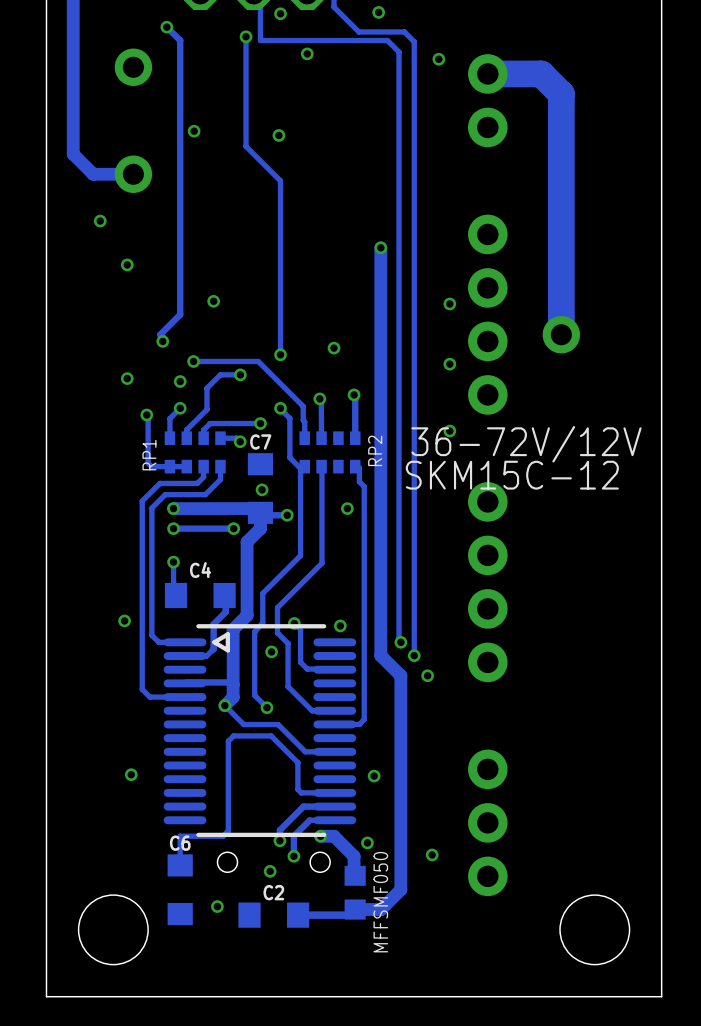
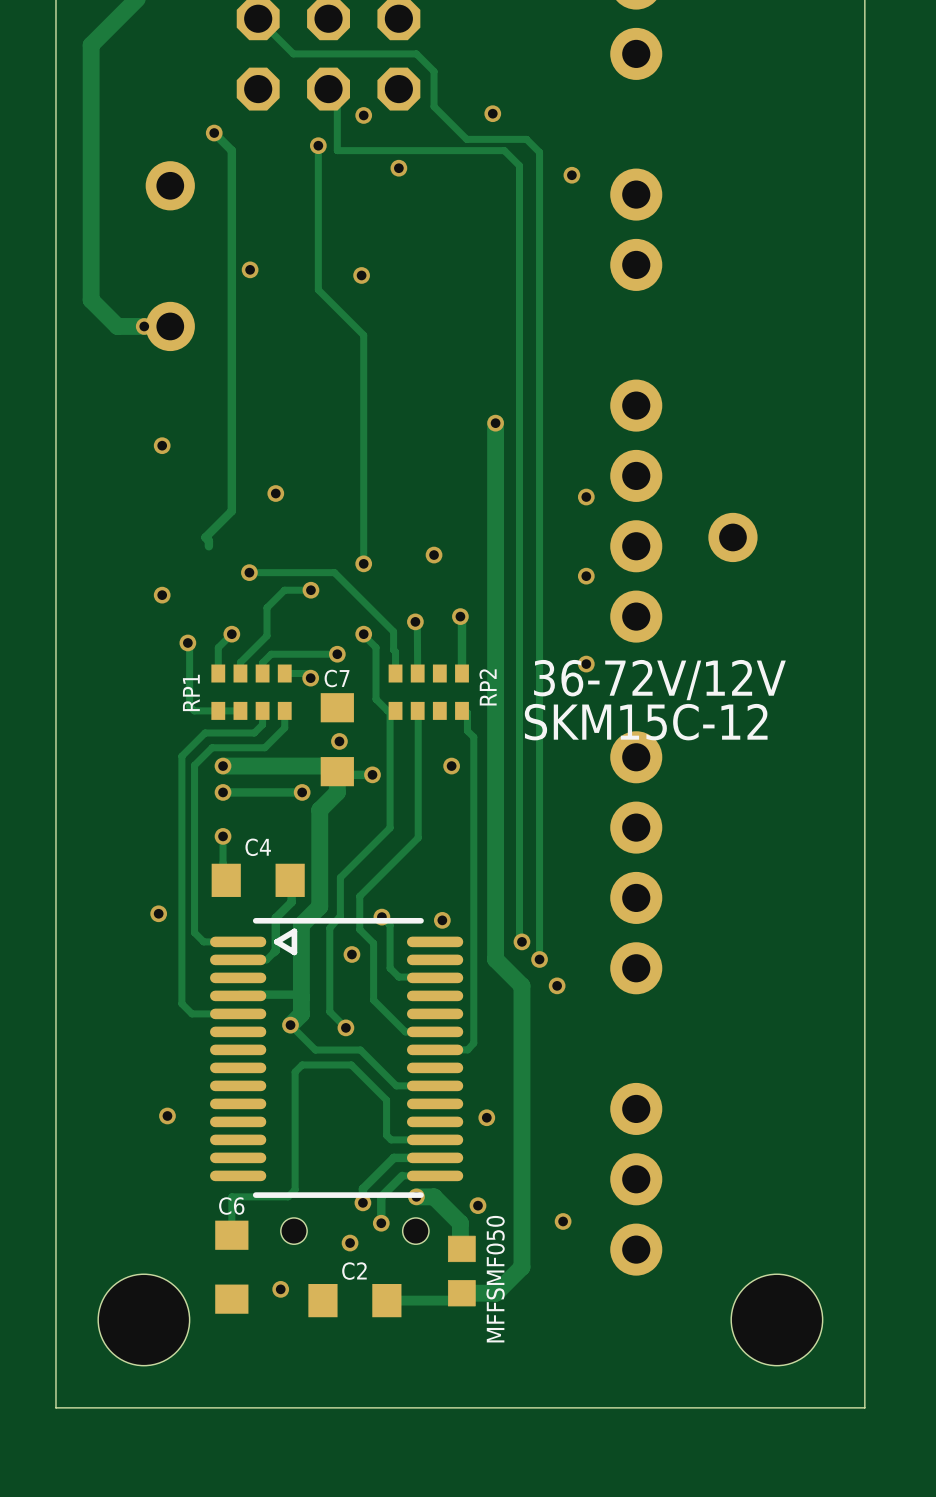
track: (487, 73) (541, 73) (561, 94) (561, 334) -> none
via position: (100, 221) -> (144, 326)
via: (162, 341) -> none
via: (180, 381) -> none

